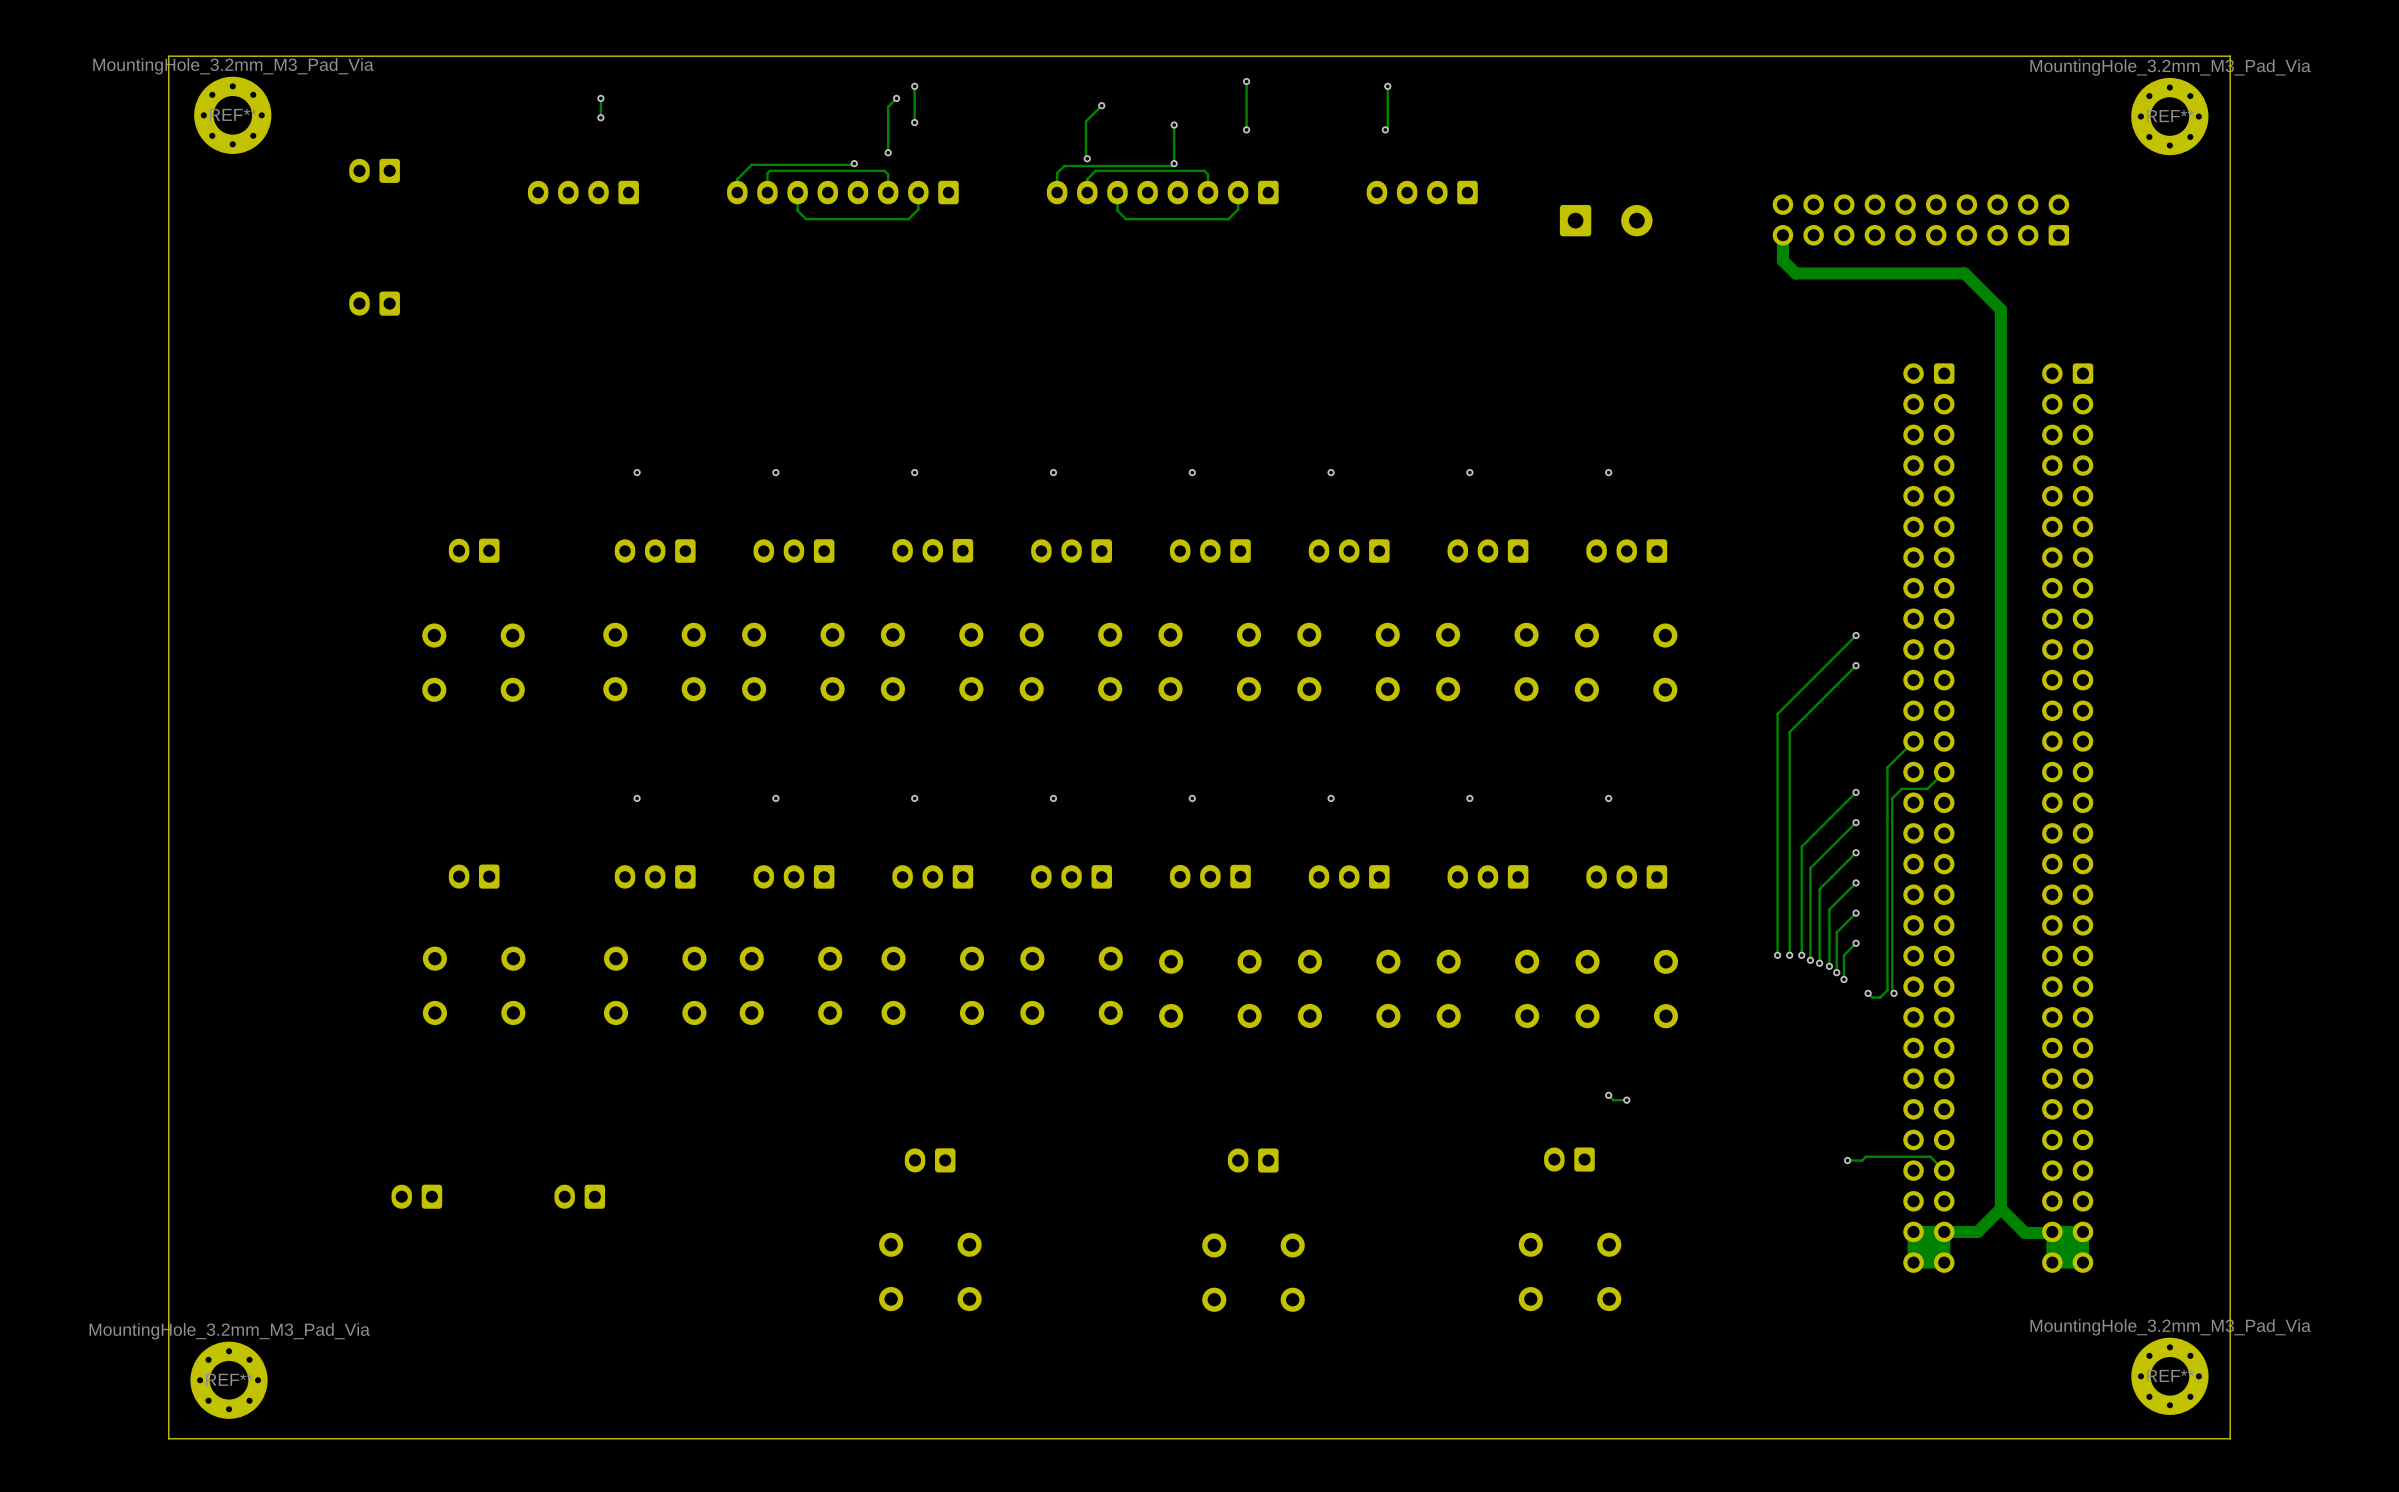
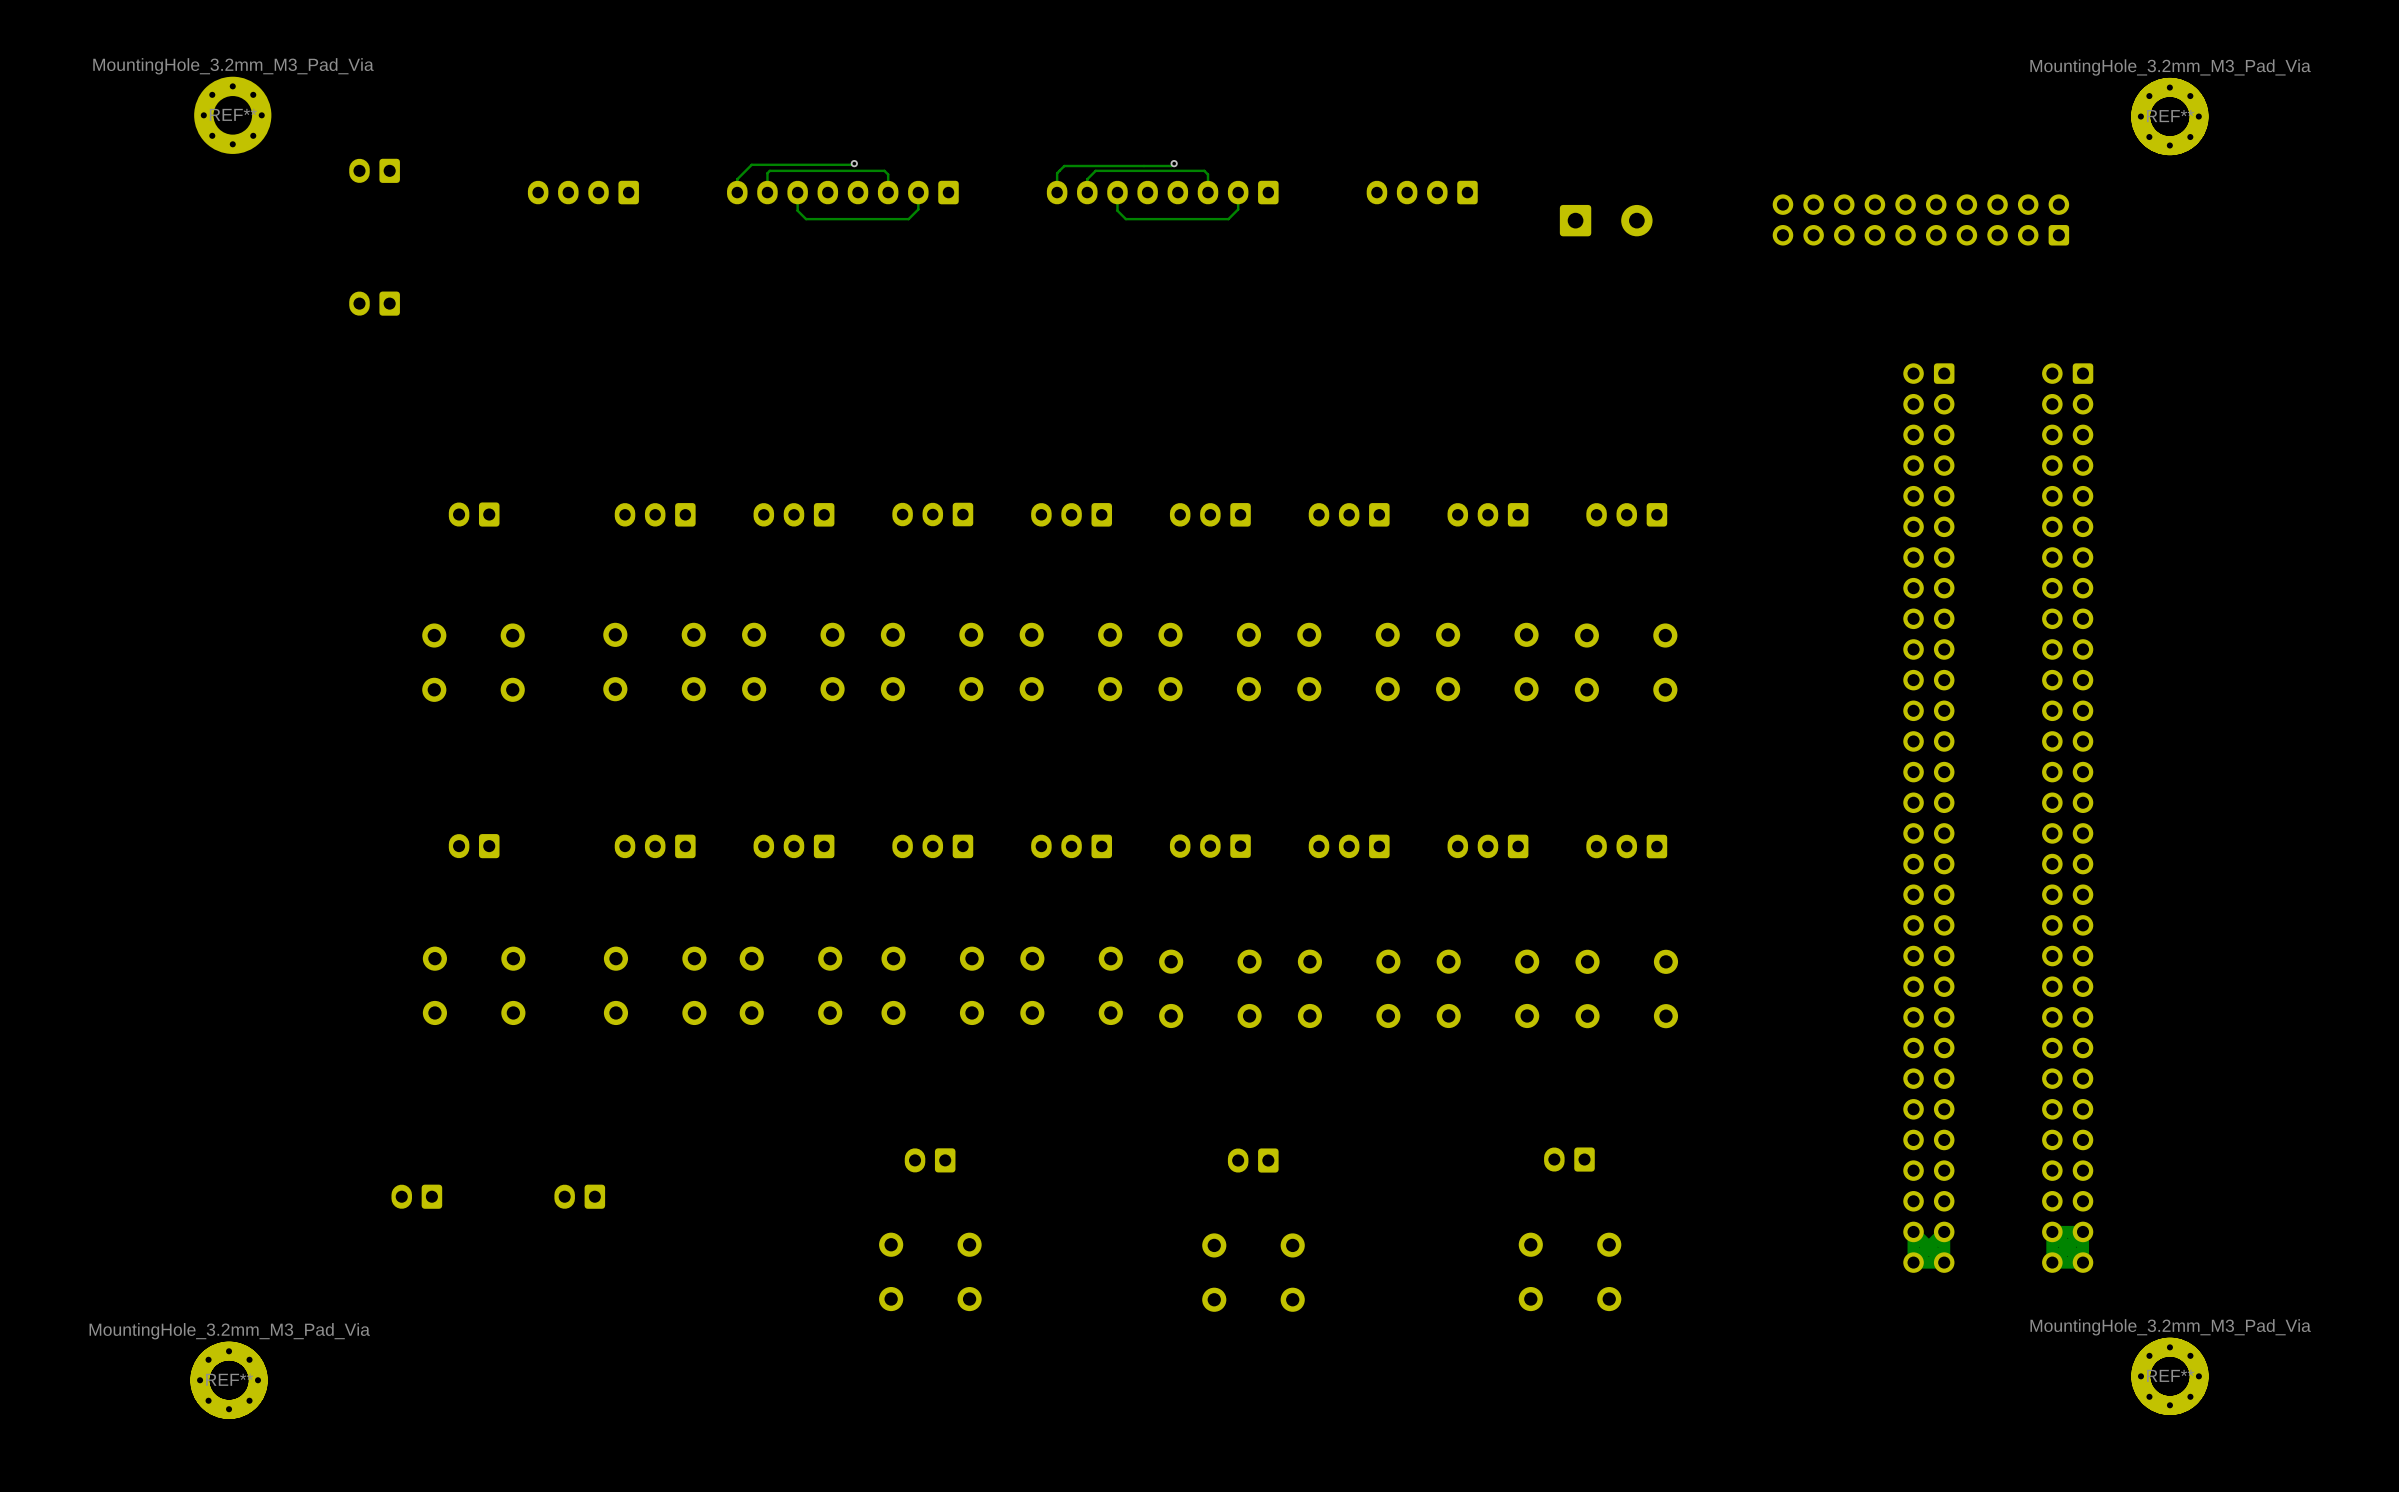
board edge: (2230, 56) (168, 56) (168, 1438) (2230, 1438) (2230, 56) -> none
track: (1246, 81) (1246, 129) -> none
via: (1246, 81) -> none
track: (914, 86) (914, 122) -> none
via: (914, 86) -> none
track: (1387, 86) (1387, 127) (1385, 129) -> none
via: (1387, 86) -> none
track: (600, 98) (600, 117) -> none
via: (600, 98) -> none
track: (896, 98) (888, 106) (888, 152) -> none
via: (896, 98) -> none
track: (1101, 105) (1085, 121) (1087, 158) -> none
via: (1101, 105) -> none
part: none -> (2169, 116)
via: (600, 117) -> none
via: (914, 122) -> none
track: (1174, 125) (1174, 163) -> none
via: (1174, 125) -> none
via: (1246, 129) -> none
via: (1385, 129) -> none
via: (888, 152) -> none
via: (1087, 158) -> none
track: (1782, 235) (1782, 260) (1795, 273) (1964, 273) (2000, 309) (2000, 1208) -> none
via: (637, 472) -> none
via: (775, 472) -> none
via: (914, 472) -> none
via: (1053, 472) -> none
via: (1192, 472) -> none
via: (1331, 472) -> none
via: (1469, 472) -> none
via: (1608, 472) -> none
part position: (474, 550) -> (474, 514)
part position: (932, 550) -> (932, 514)
part position: (655, 551) -> (655, 514)
part position: (793, 551) -> (793, 514)
part position: (1071, 551) -> (1071, 514)
part position: (1210, 551) -> (1210, 514)
part position: (1349, 551) -> (1349, 514)
part position: (1487, 551) -> (1487, 514)
part position: (1626, 551) -> (1626, 514)
track: (1856, 635) (1777, 713) (1777, 955) -> none
via: (1856, 635) -> none
track: (1856, 665) (1789, 732) (1789, 955) -> none
via: (1856, 665) -> none
track: (1913, 741) (1887, 767) (1887, 990) (1880, 997) (1872, 997) (1868, 993) -> none
track: (1944, 772) (1927, 788) (1901, 788) (1892, 798) (1892, 991) (1894, 993) -> none
track: (1856, 792) (1801, 846) (1801, 955) -> none
via: (1856, 792) -> none
via: (637, 798) -> none
via: (775, 798) -> none
via: (914, 798) -> none
via: (1053, 798) -> none
via: (1192, 798) -> none
via: (1331, 798) -> none
via: (1469, 798) -> none
via: (1608, 798) -> none
track: (1856, 822) (1810, 868) (1810, 960) -> none
via: (1856, 822) -> none
track: (1856, 852) (1819, 889) (1819, 963) -> none
via: (1856, 852) -> none
part position: (474, 876) -> (474, 846)
part position: (655, 876) -> (655, 846)
part position: (793, 876) -> (793, 846)
part position: (932, 876) -> (932, 846)
part position: (1071, 876) -> (1071, 846)
part position: (1210, 876) -> (1210, 846)
part position: (1349, 876) -> (1349, 846)
part position: (1487, 876) -> (1487, 846)
part position: (1626, 877) -> (1626, 846)
track: (1856, 882) (1829, 909) (1829, 966) -> none
via: (1856, 882) -> none
track: (1856, 913) (1836, 932) (1836, 972) -> none
via: (1856, 913) -> none
track: (1856, 943) (1843, 955) (1843, 979) -> none
via: (1856, 943) -> none
via: (1777, 955) -> none
via: (1789, 955) -> none
via: (1801, 955) -> none
via: (1810, 960) -> none
via: (1819, 963) -> none
via: (1829, 966) -> none
via: (1836, 972) -> none
via: (1843, 979) -> none
via: (1868, 993) -> none
via: (1894, 993) -> none
track: (1608, 1095) (1613, 1100) (1626, 1100) -> none
via: (1608, 1095) -> none
via: (1626, 1100) -> none
track: (1847, 1160) (1862, 1160) (1865, 1156) (1930, 1156) (1944, 1170) -> none
via: (1847, 1160) -> none
track: (2000, 1208) (2025, 1232) (2052, 1231) -> none
track: (2000, 1208) (1977, 1231) (1913, 1231) -> none
part: none -> (2169, 1376)
part: none -> (229, 1380)

